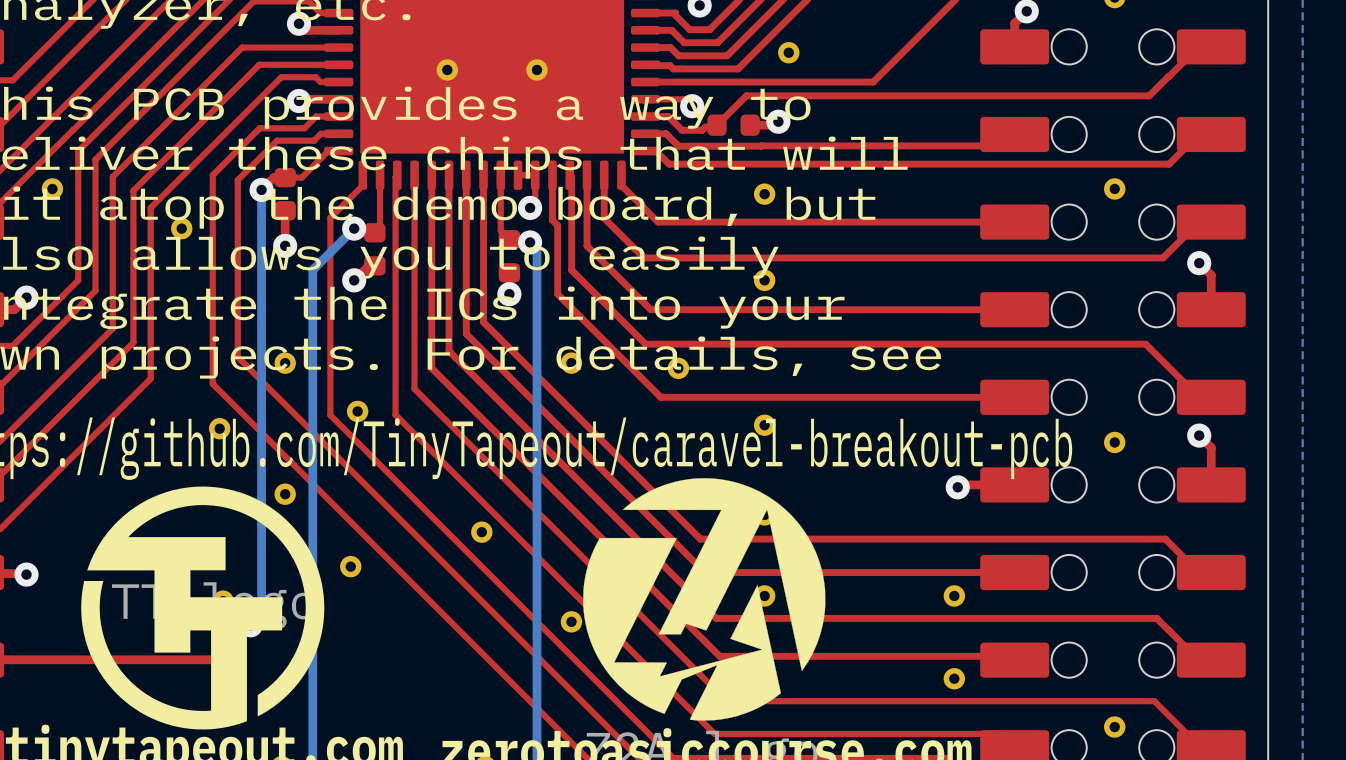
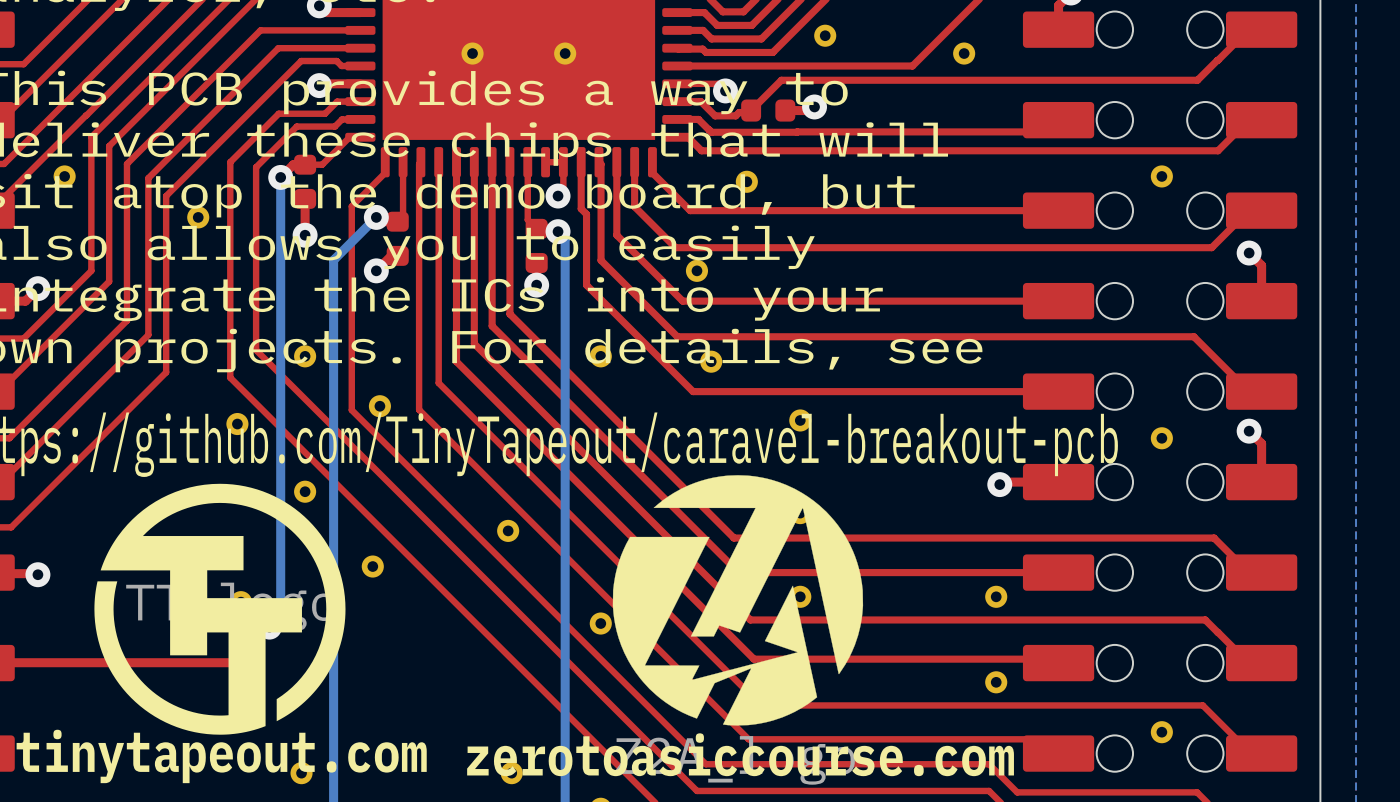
part: none -> (964, 53)
part: none -> (746, 181)
part: (764, 194) -> none
part: none -> (696, 270)
part: (764, 280) -> none

